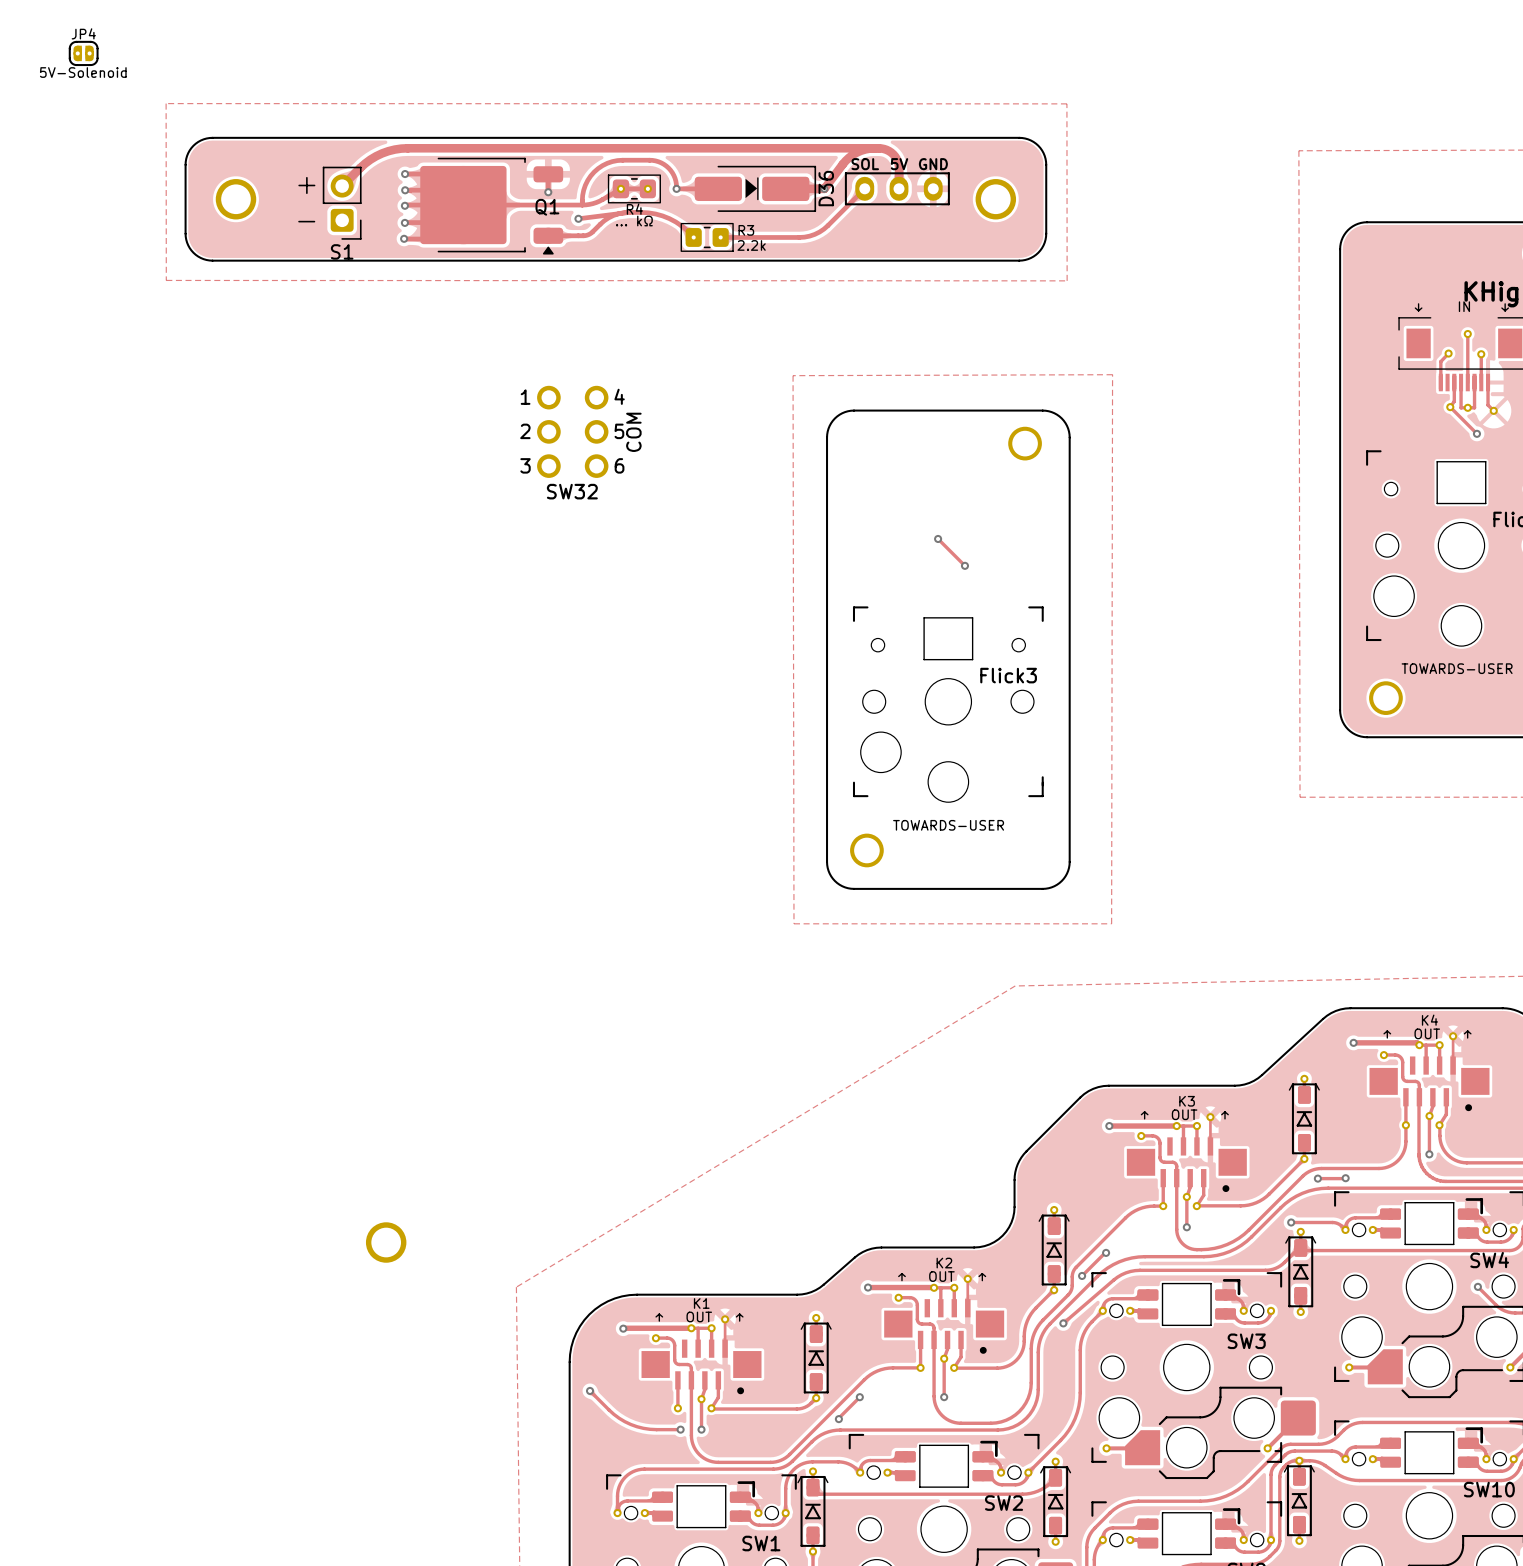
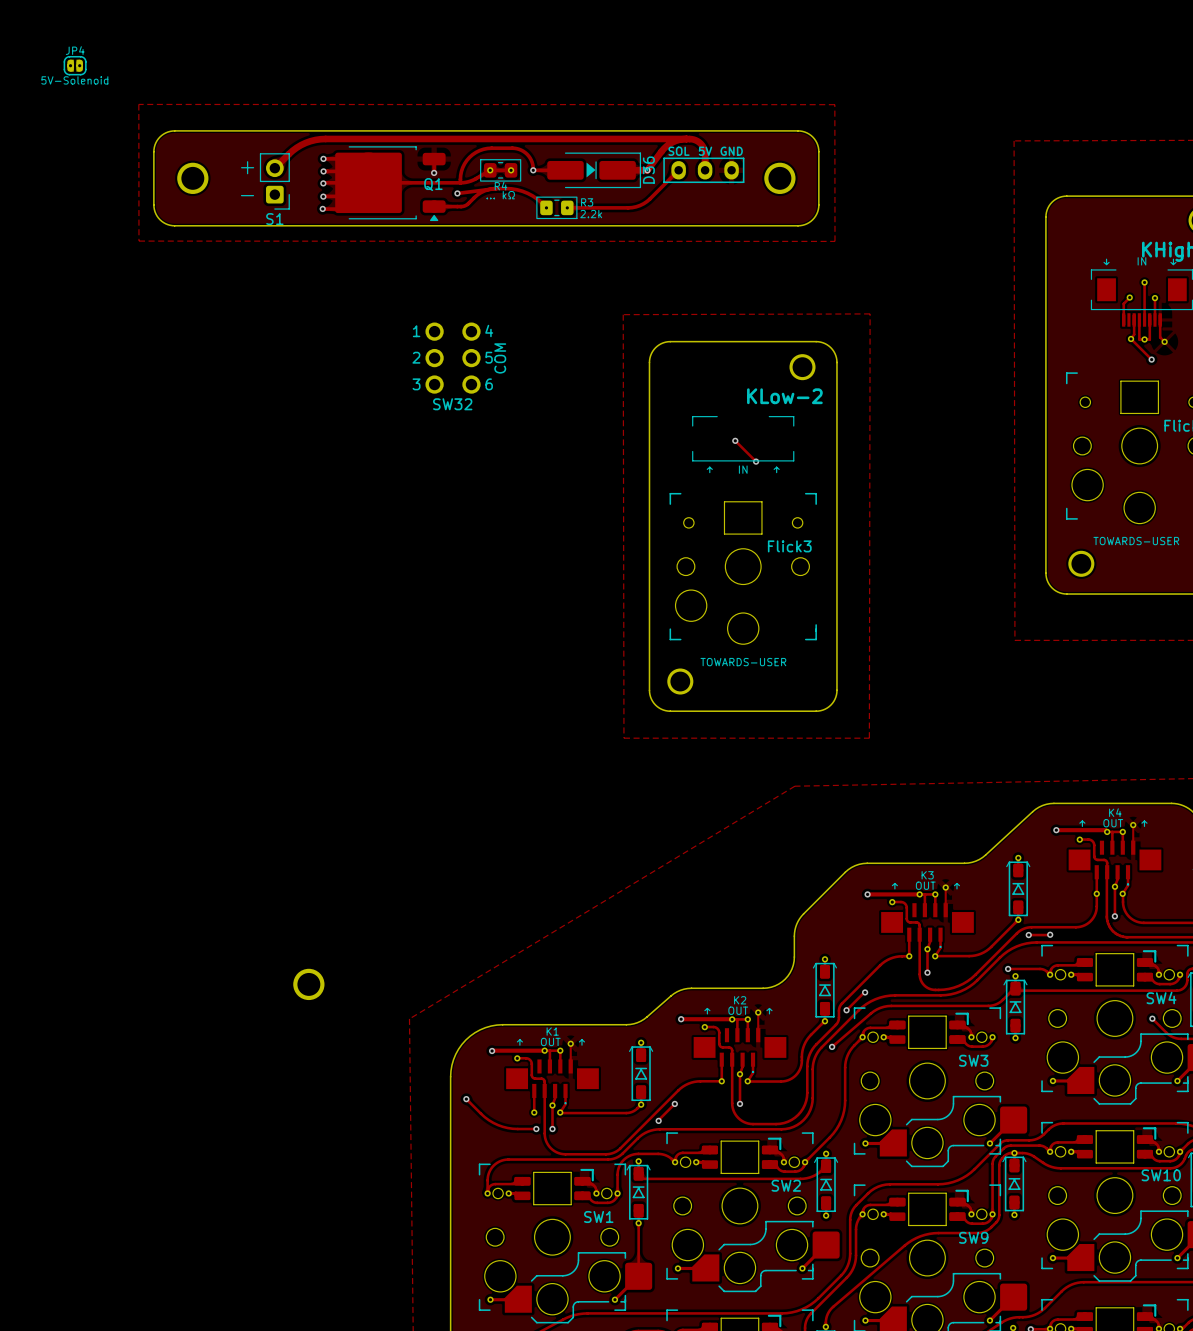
KLow-2: none -> (743, 444)
K4 footprint: [1369, 1030, 1490, 1130] -> [1068, 820, 1162, 897]
K3 footprint: [1126, 1111, 1247, 1211] -> [881, 882, 974, 960]
K2 footprint: [884, 1272, 1005, 1372] -> [693, 1007, 787, 1085]
K1 footprint: [641, 1313, 762, 1413] -> [506, 1039, 599, 1116]

